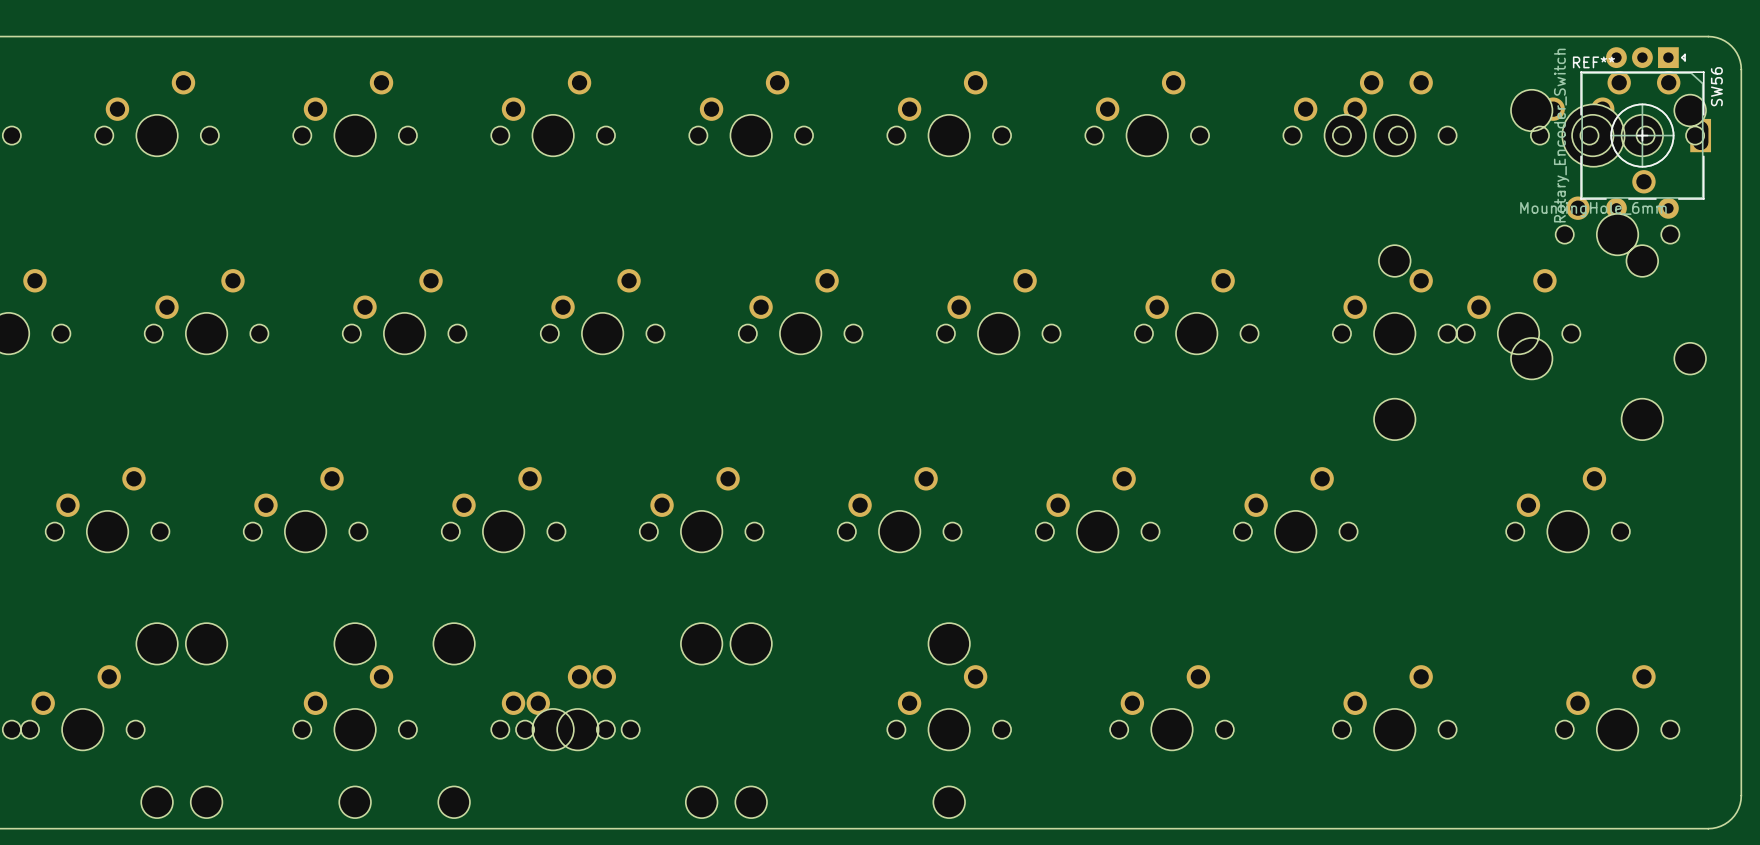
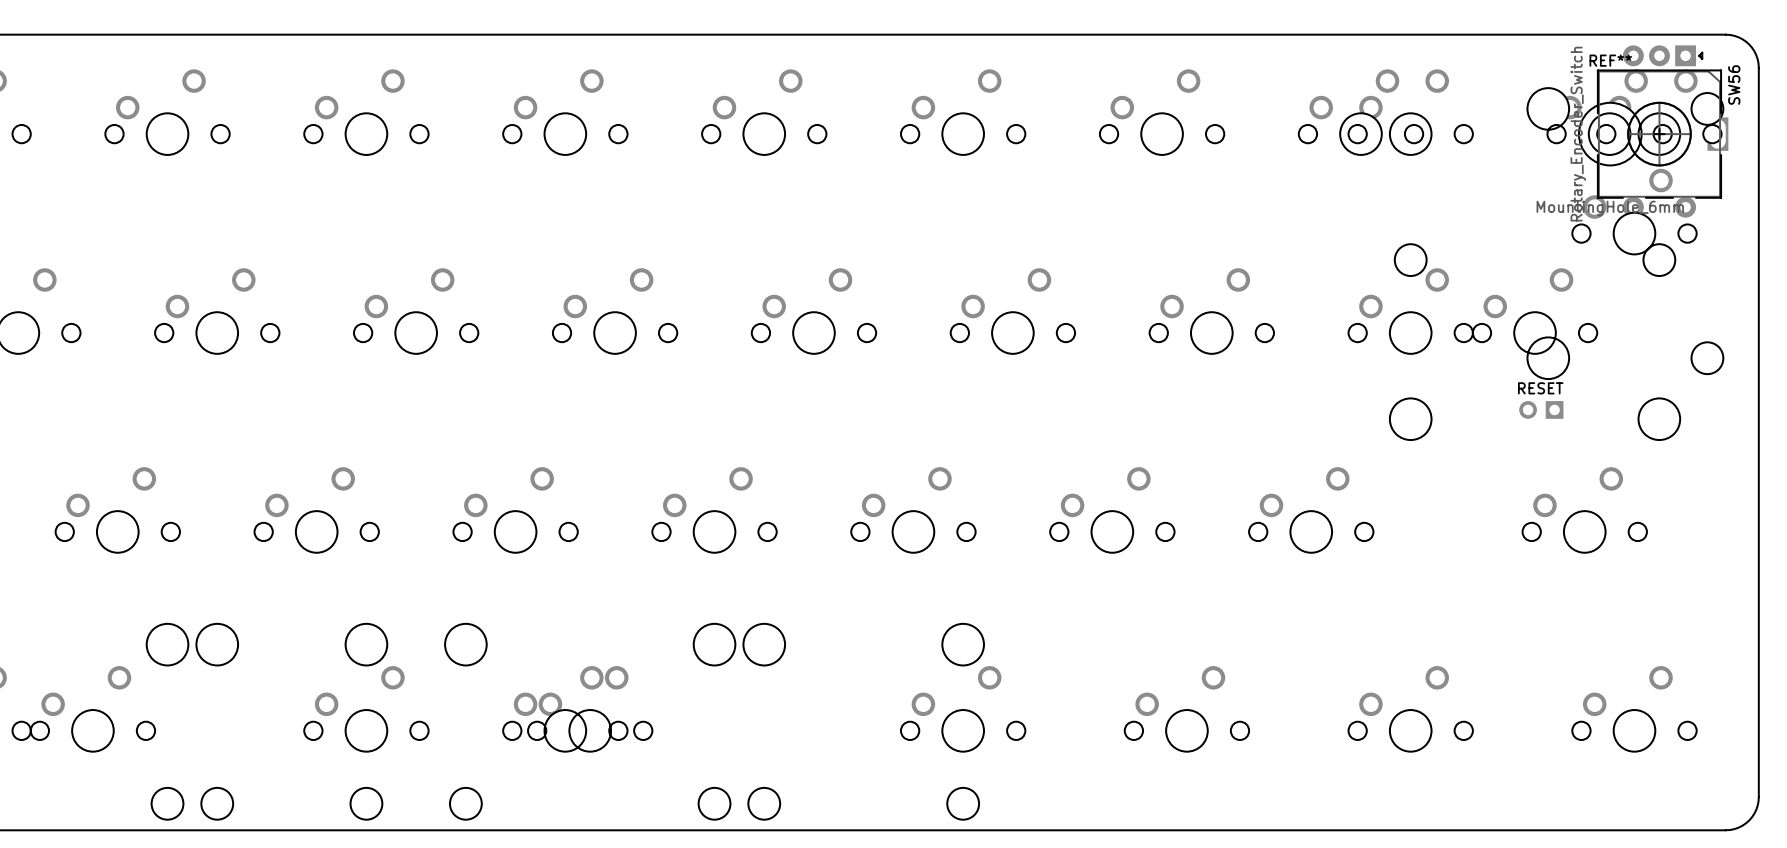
text: none -> RESET (1540, 388)
part: none -> (1541, 409)

